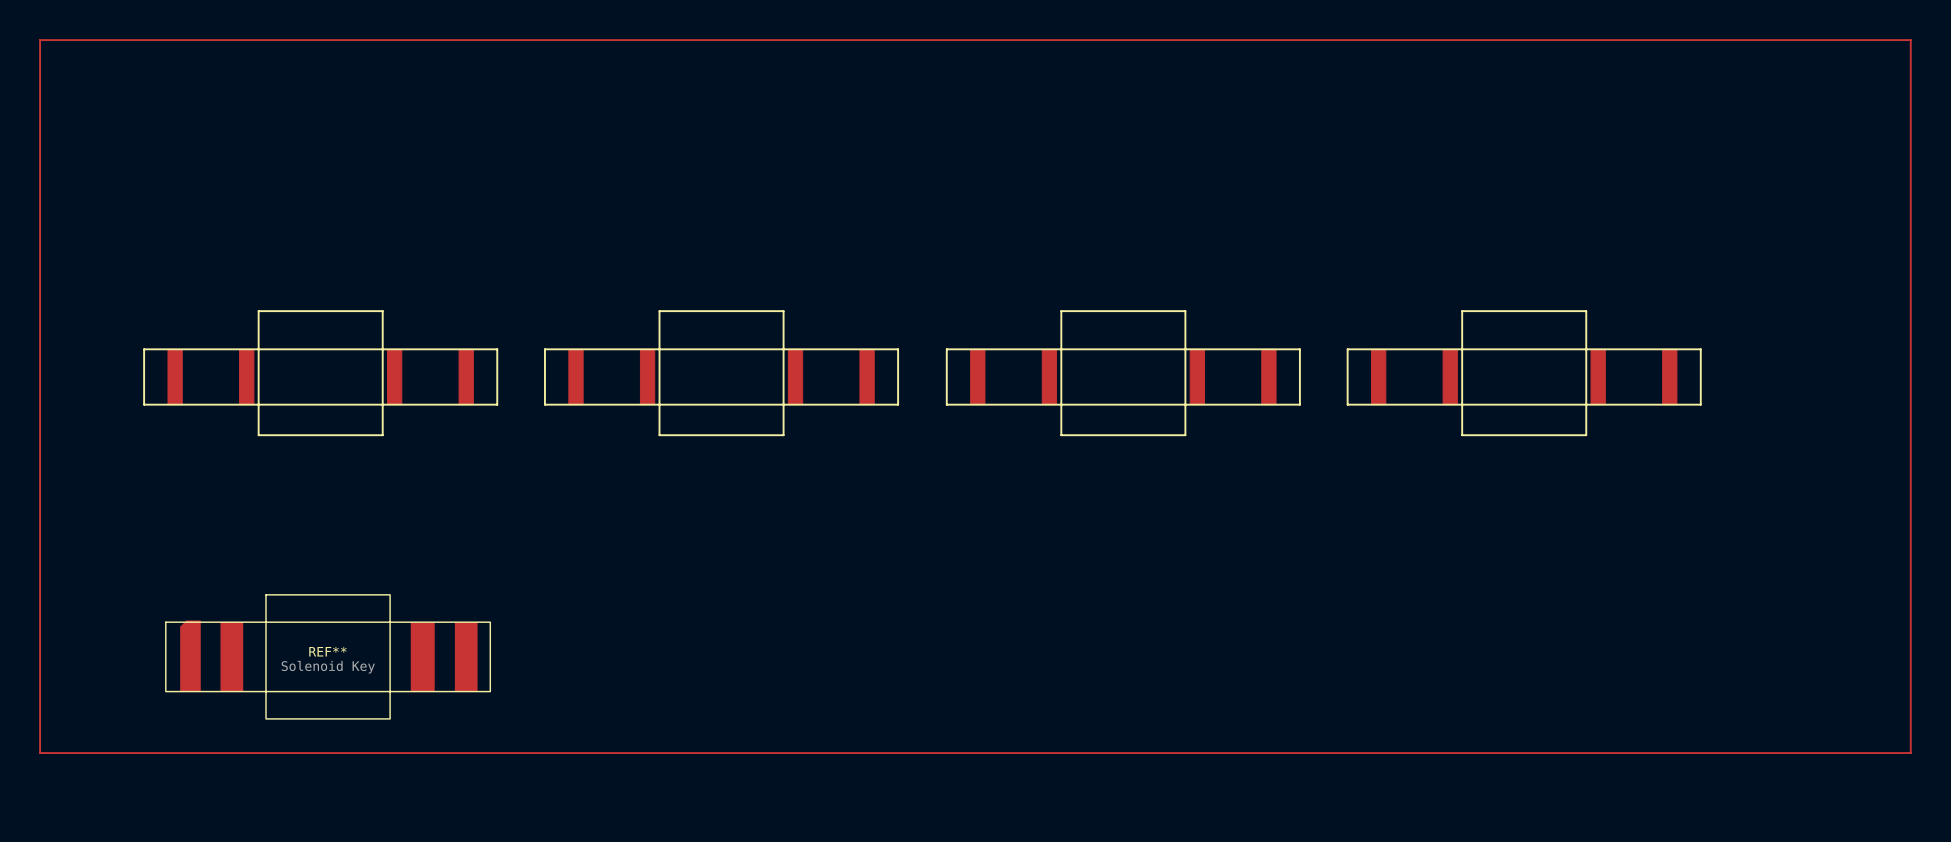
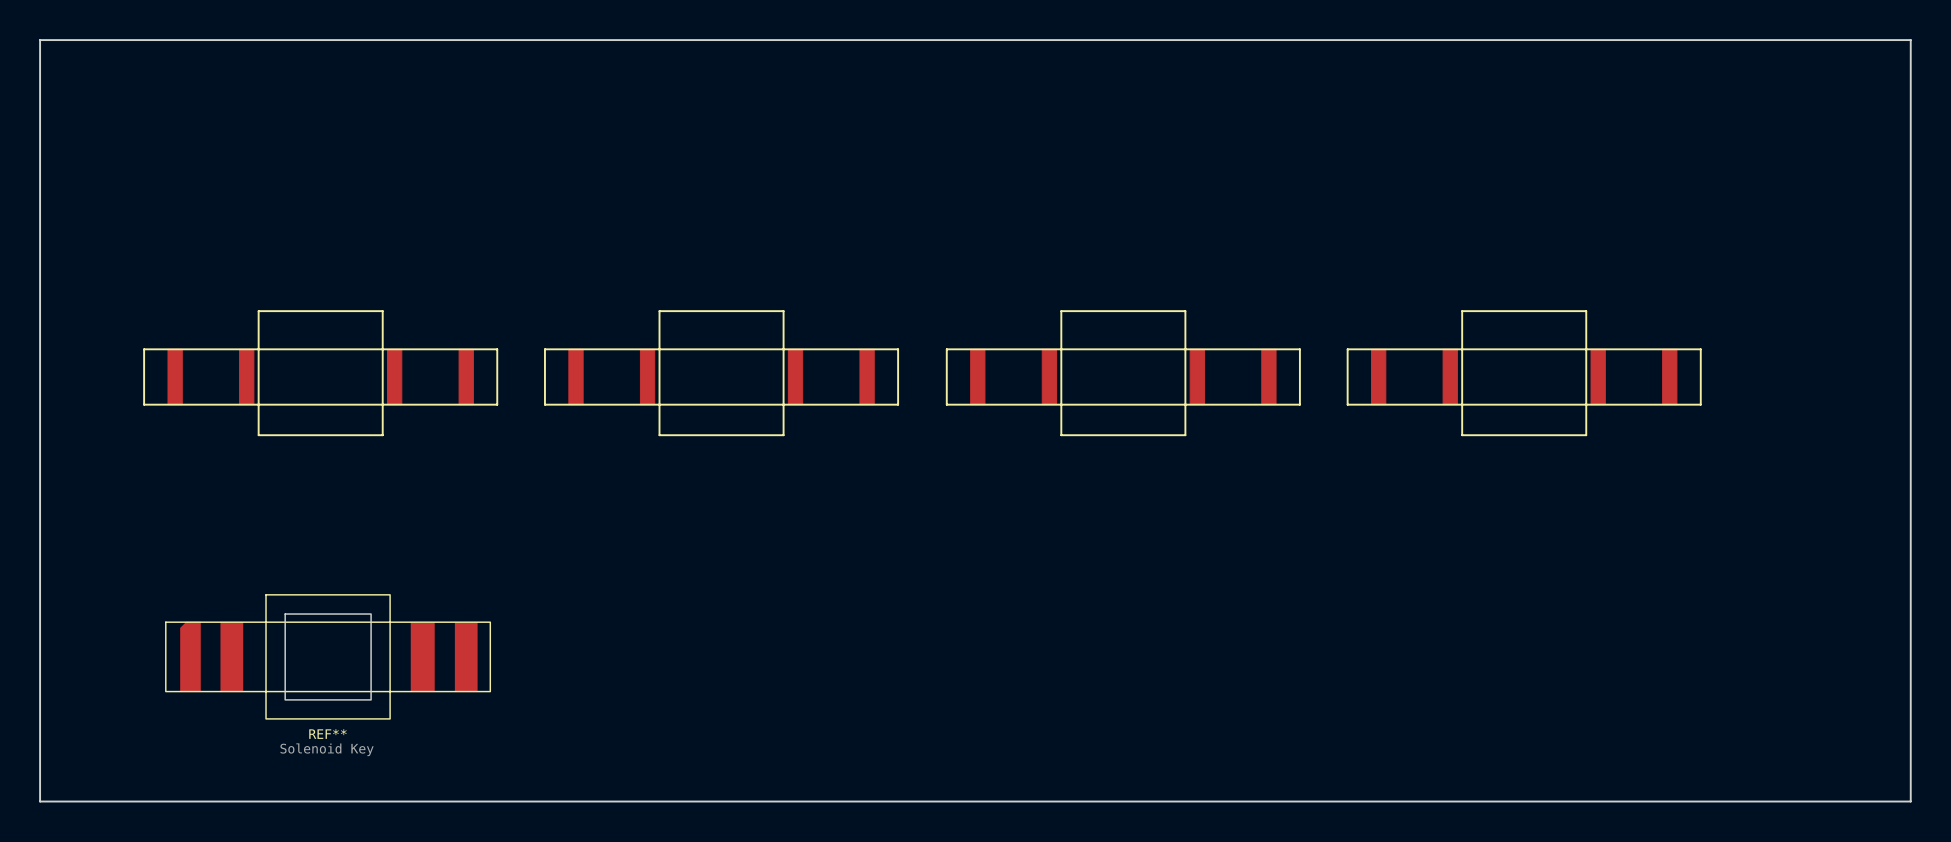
top track: (40, 40) (1910, 40) (1910, 753) (40, 753) (40, 40) -> none
board edge: none -> (40, 40) (1910, 40) (1910, 801) (40, 801) (40, 40)
REF** footprint: [165, 594, 491, 720] -> [165, 594, 491, 720]
REF** name position: REF** (327, 651) -> REF** (327, 734)
REF** value position: Solenoid Key (328, 667) -> Solenoid Key (327, 749)

